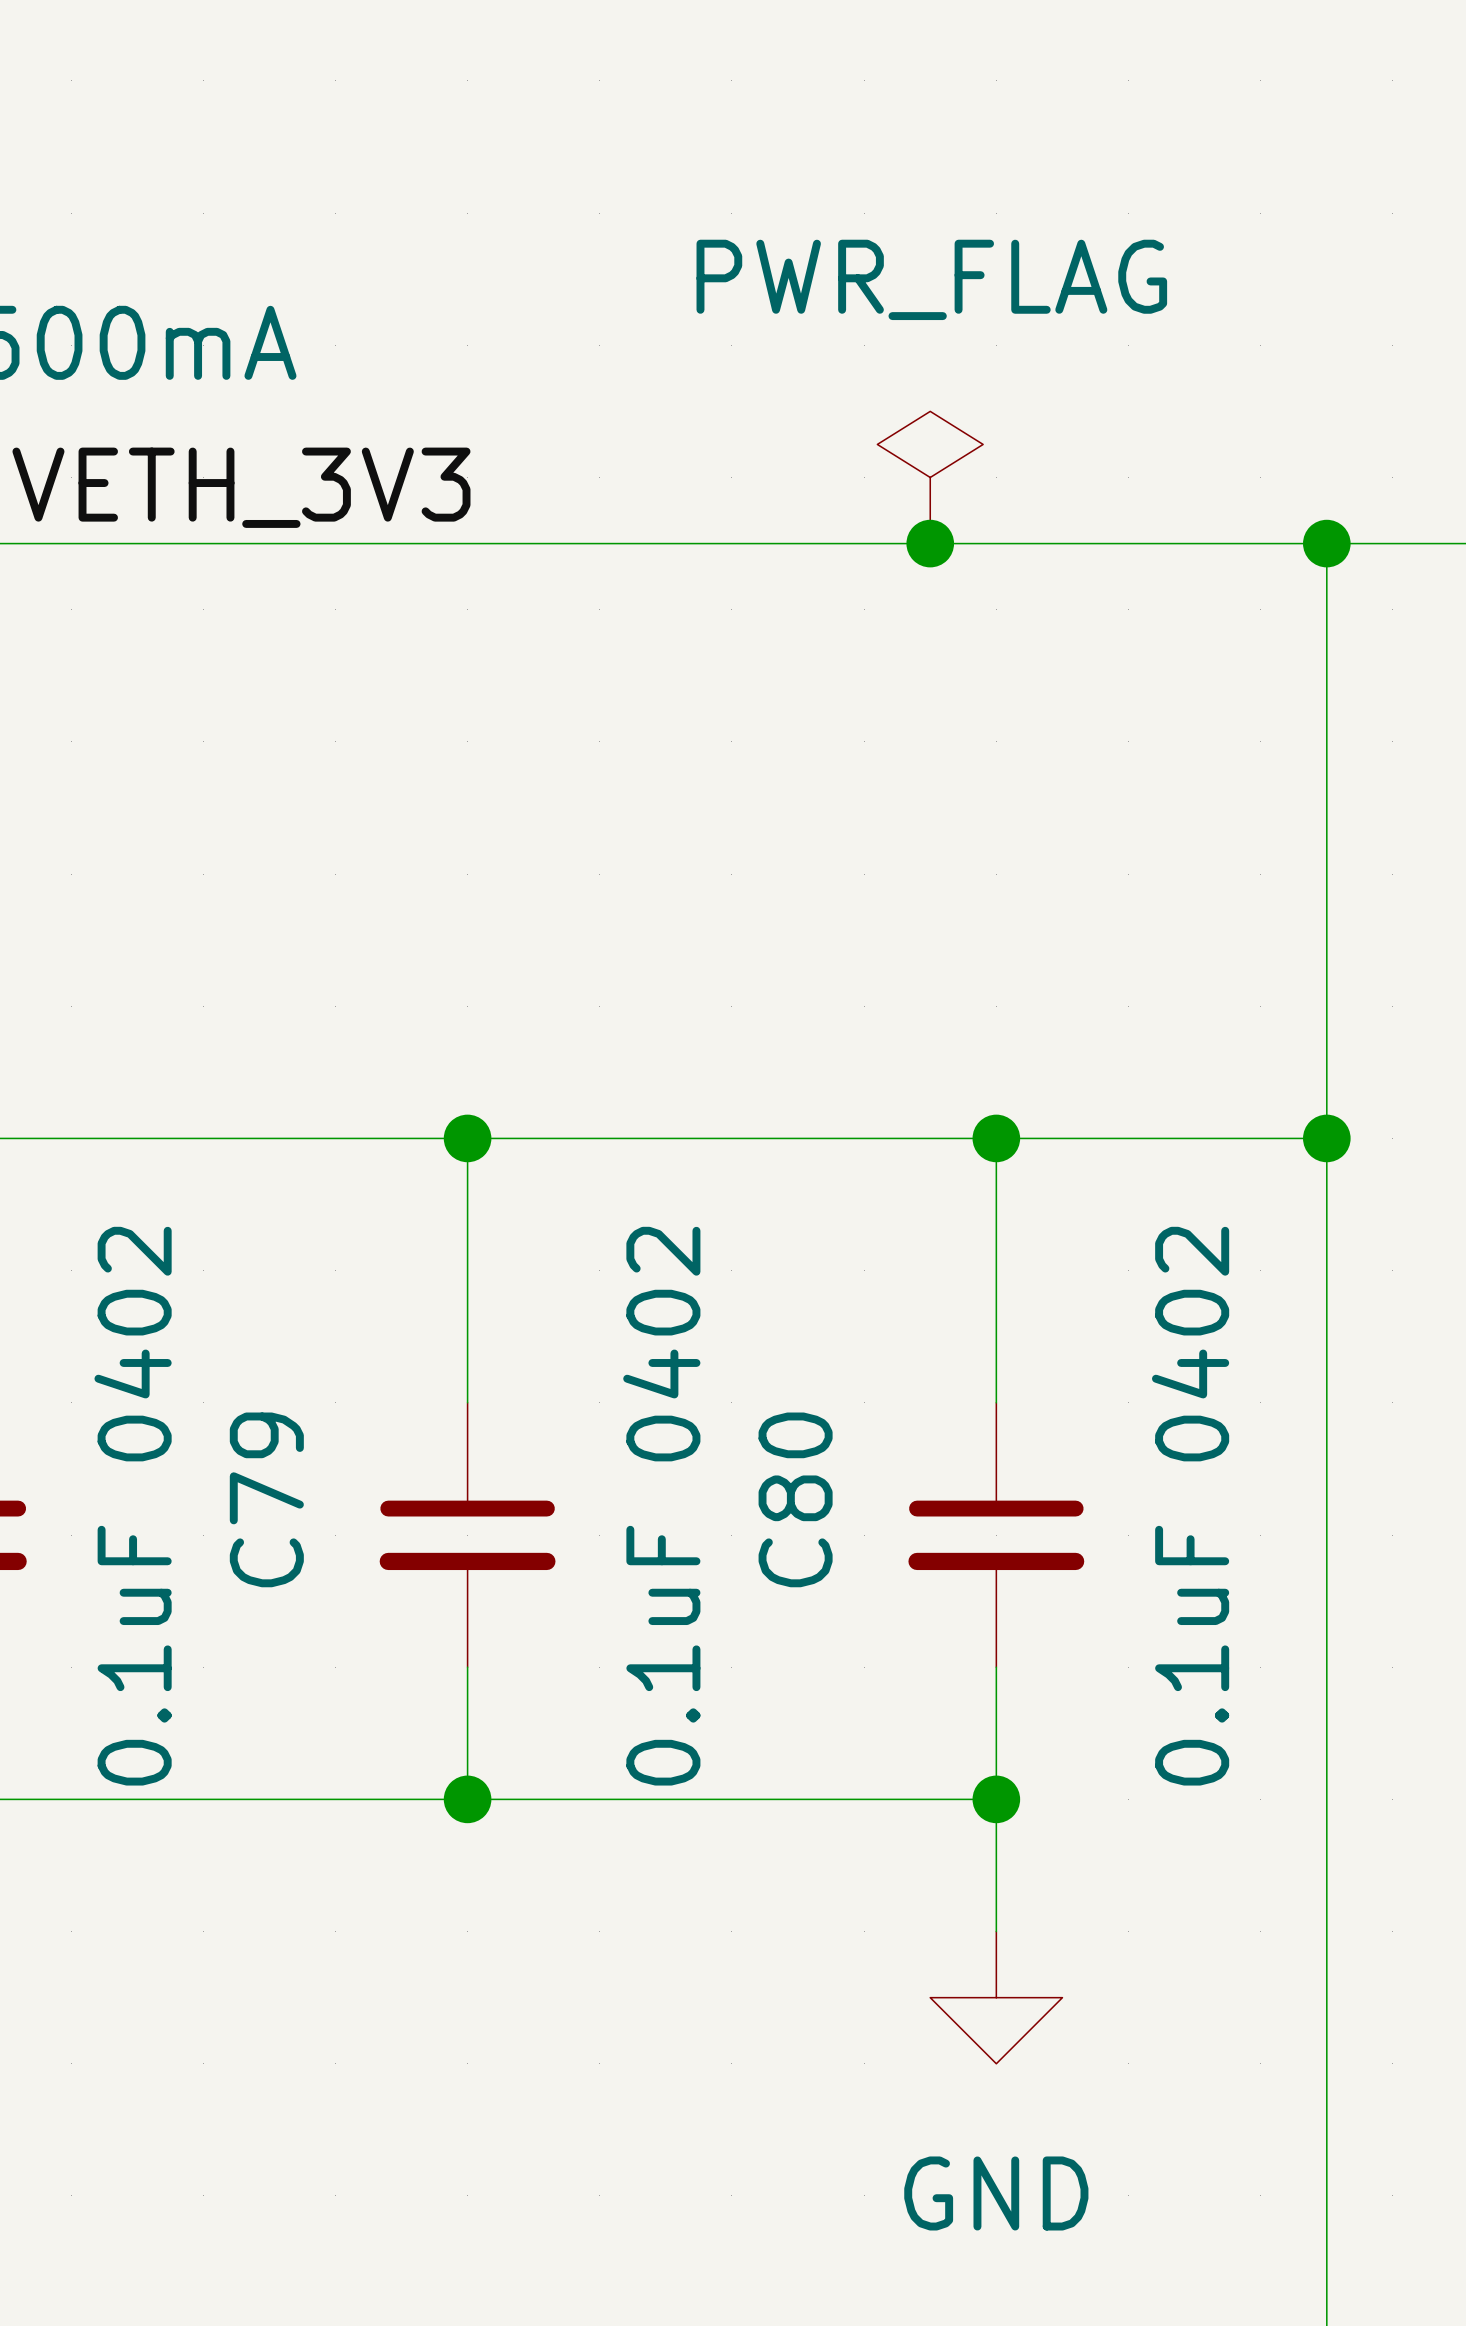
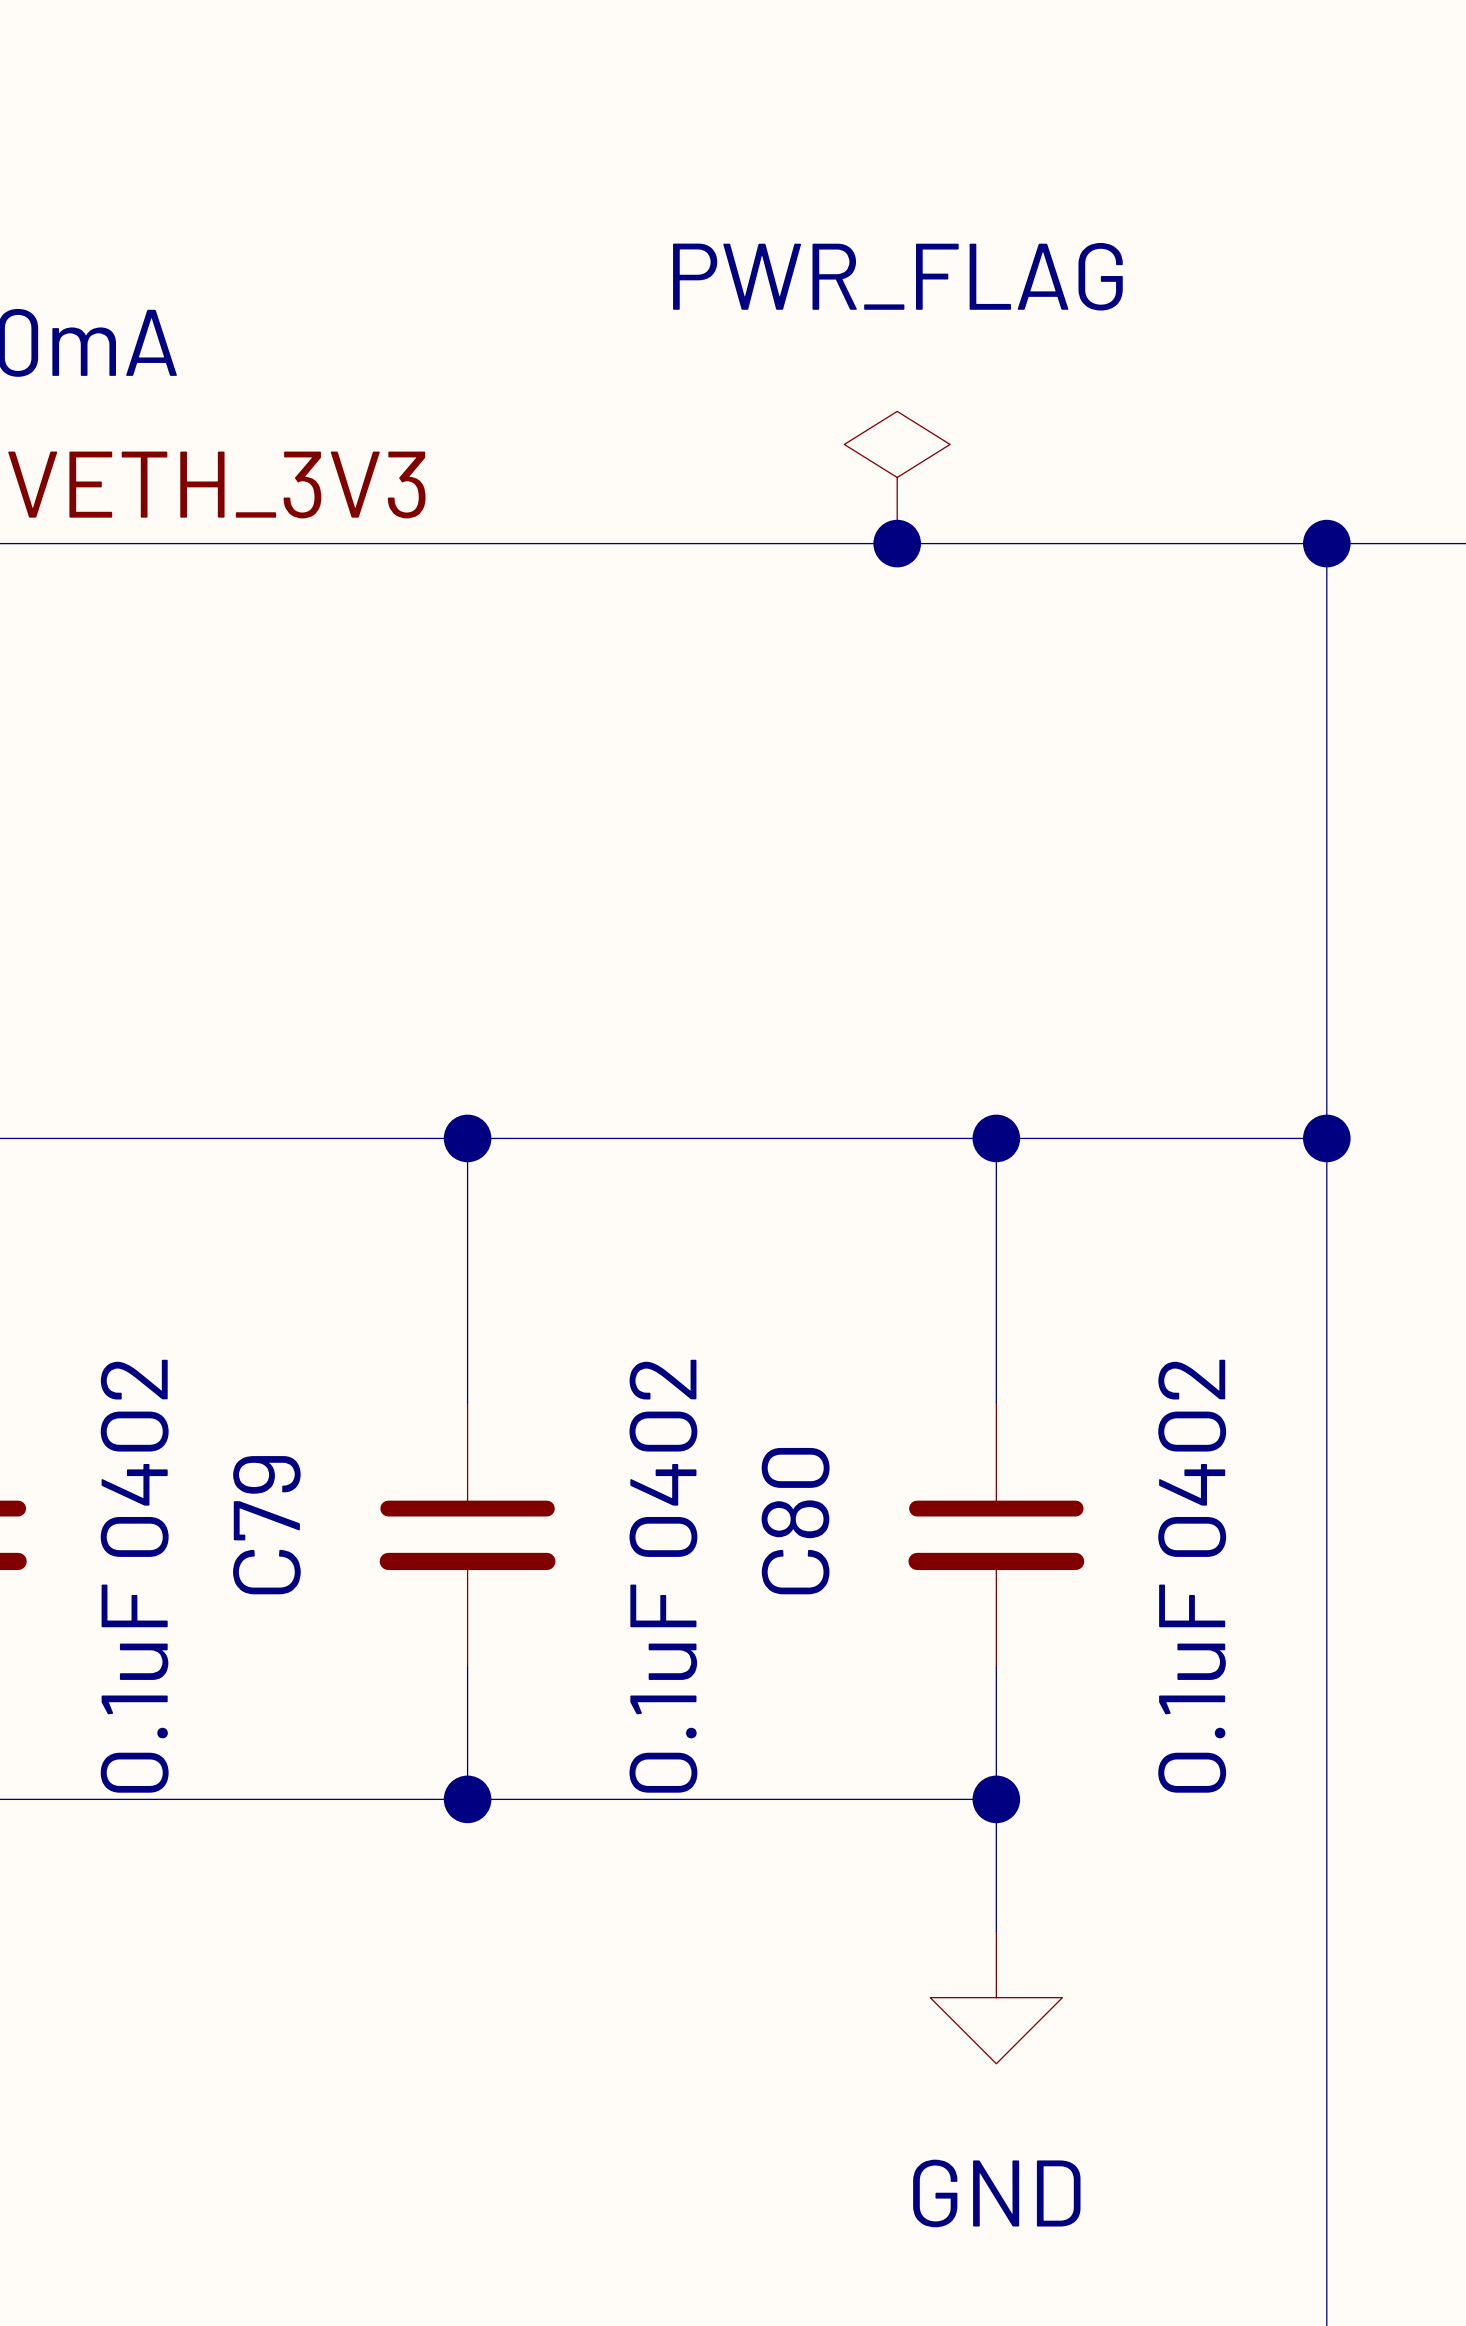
power symbol position: PWR_FLAG (930, 477) -> PWR_FLAG (897, 477)
junction position: (930, 543) -> (897, 543)

